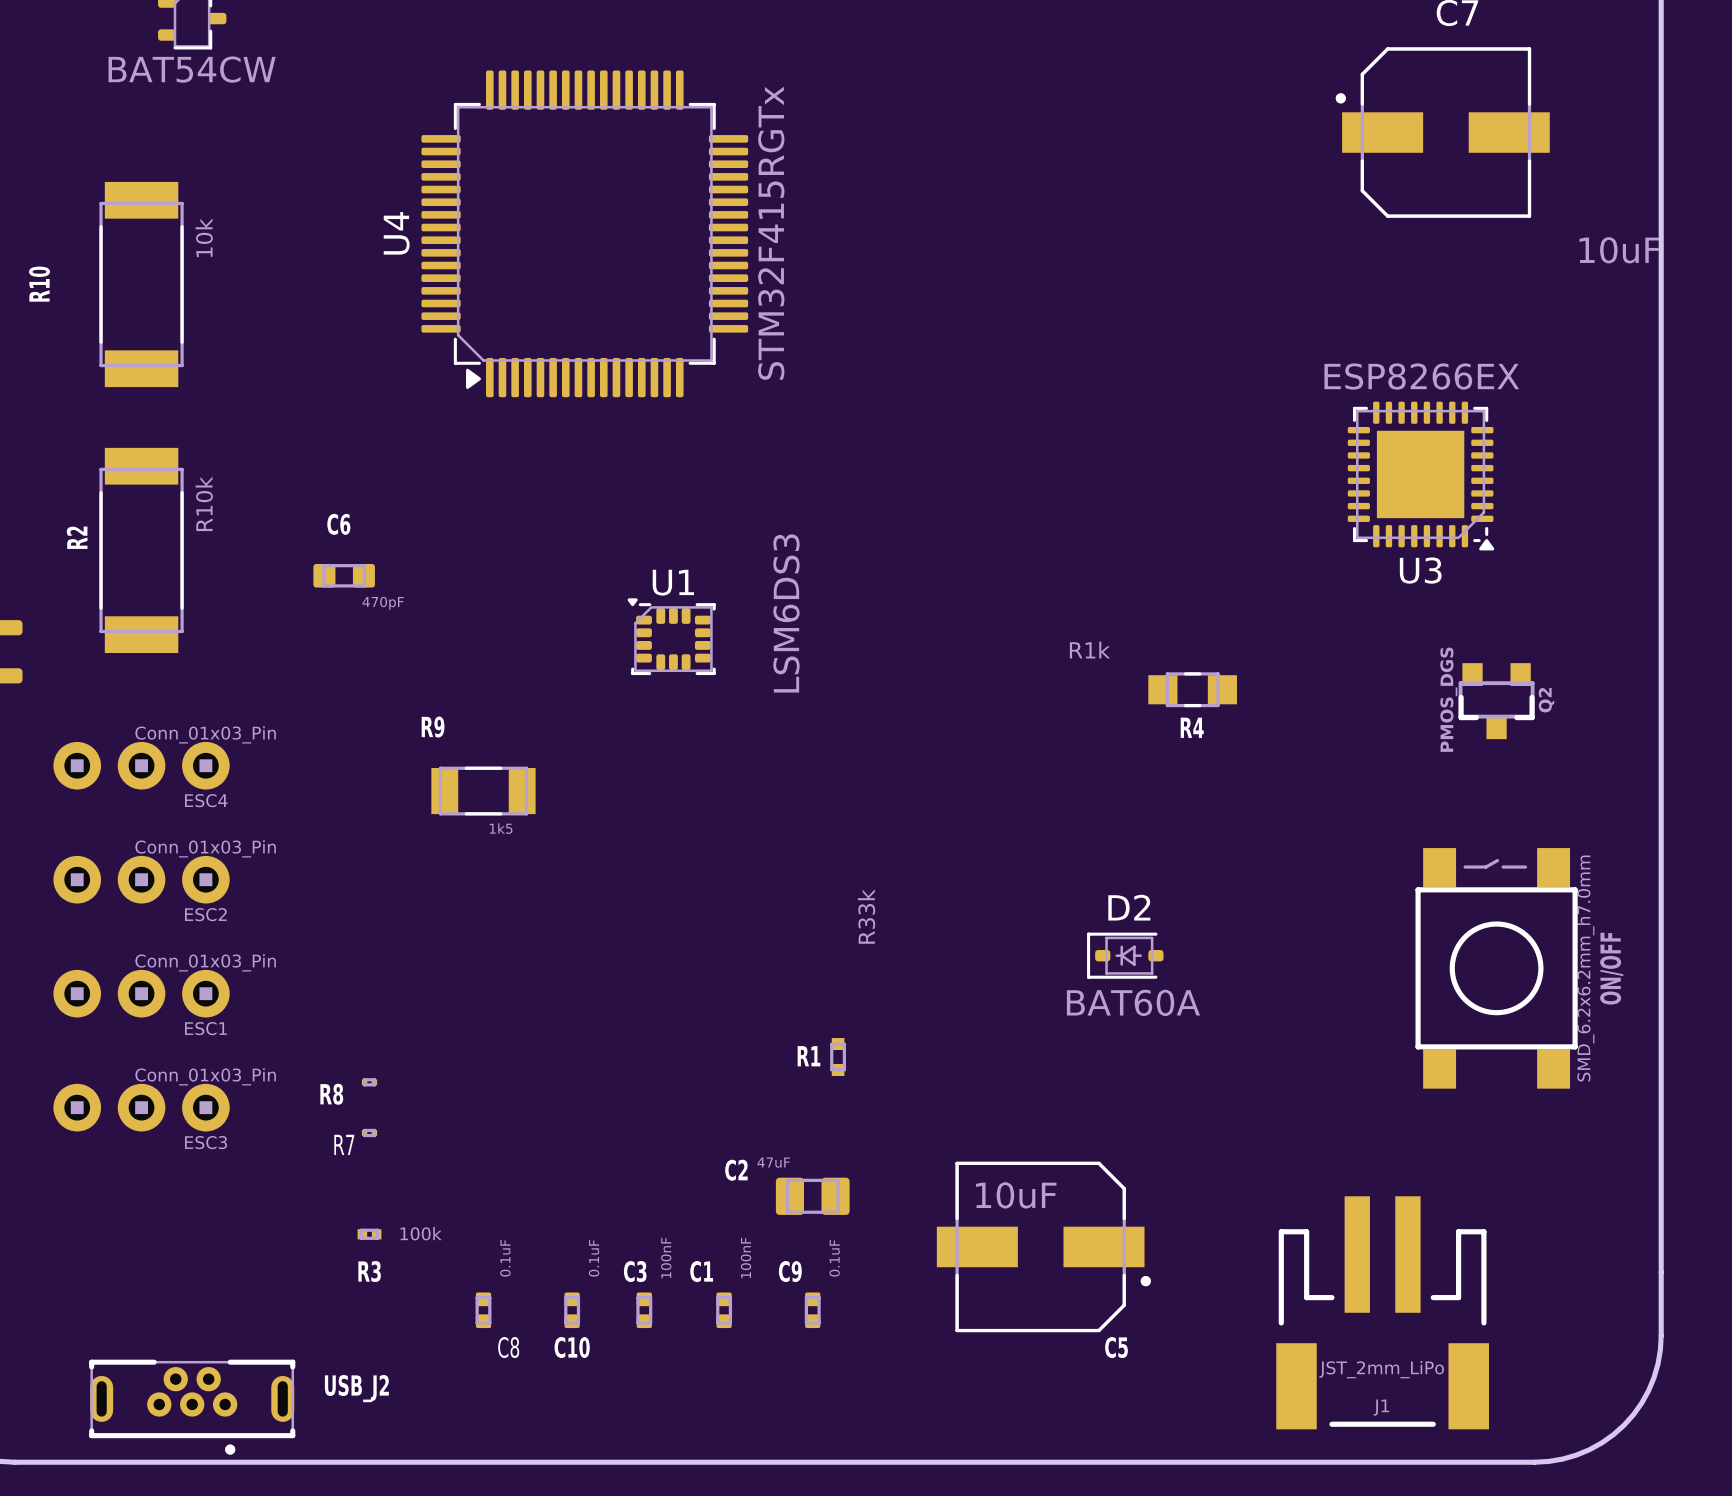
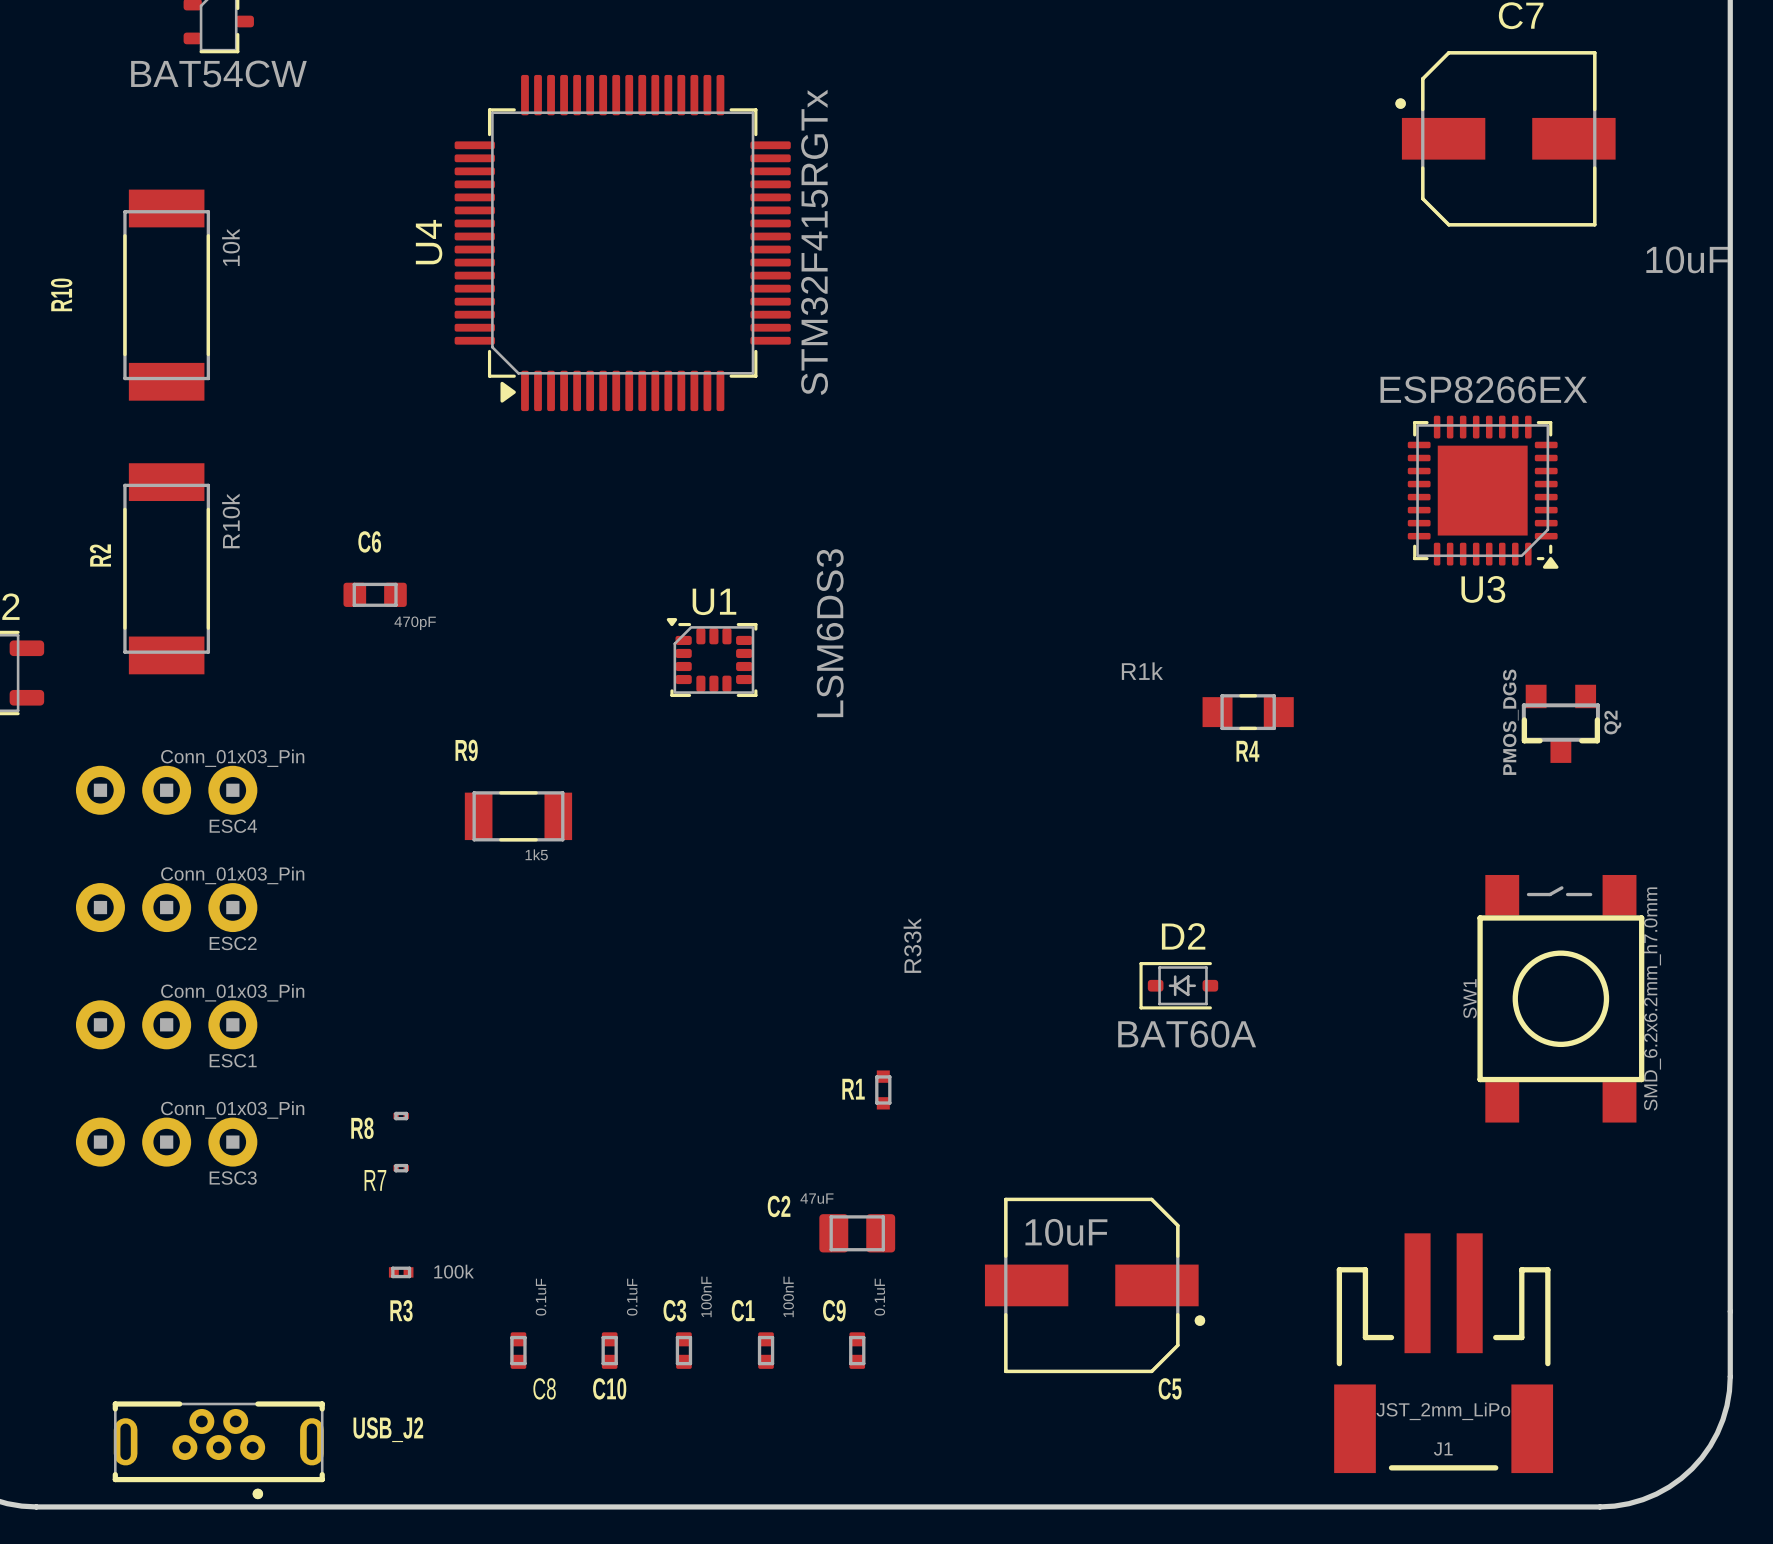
ON/OFF name: ON/OFF (1611, 968) -> SW1 (1470, 998)

